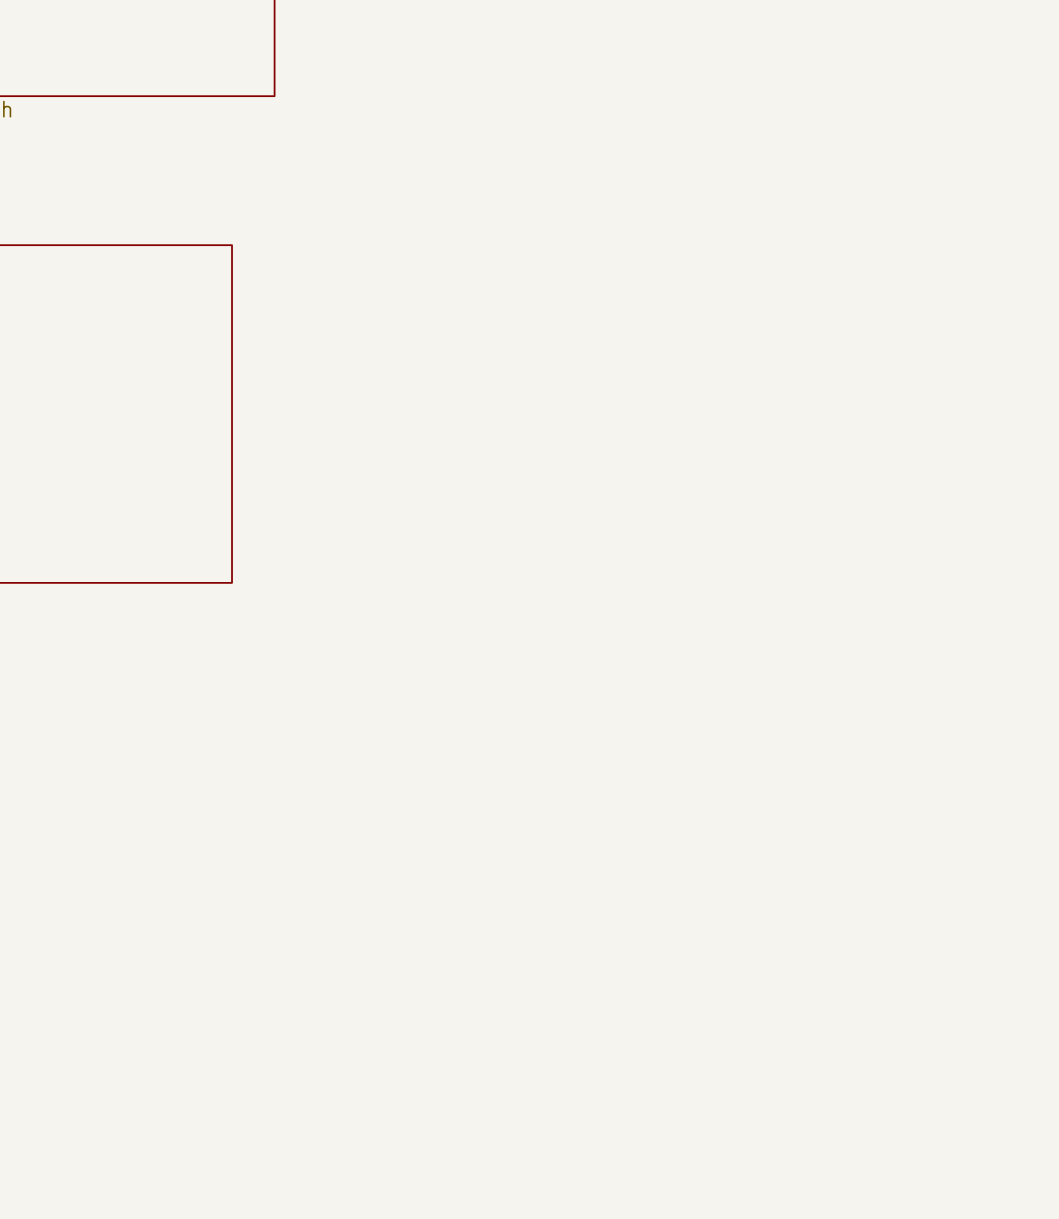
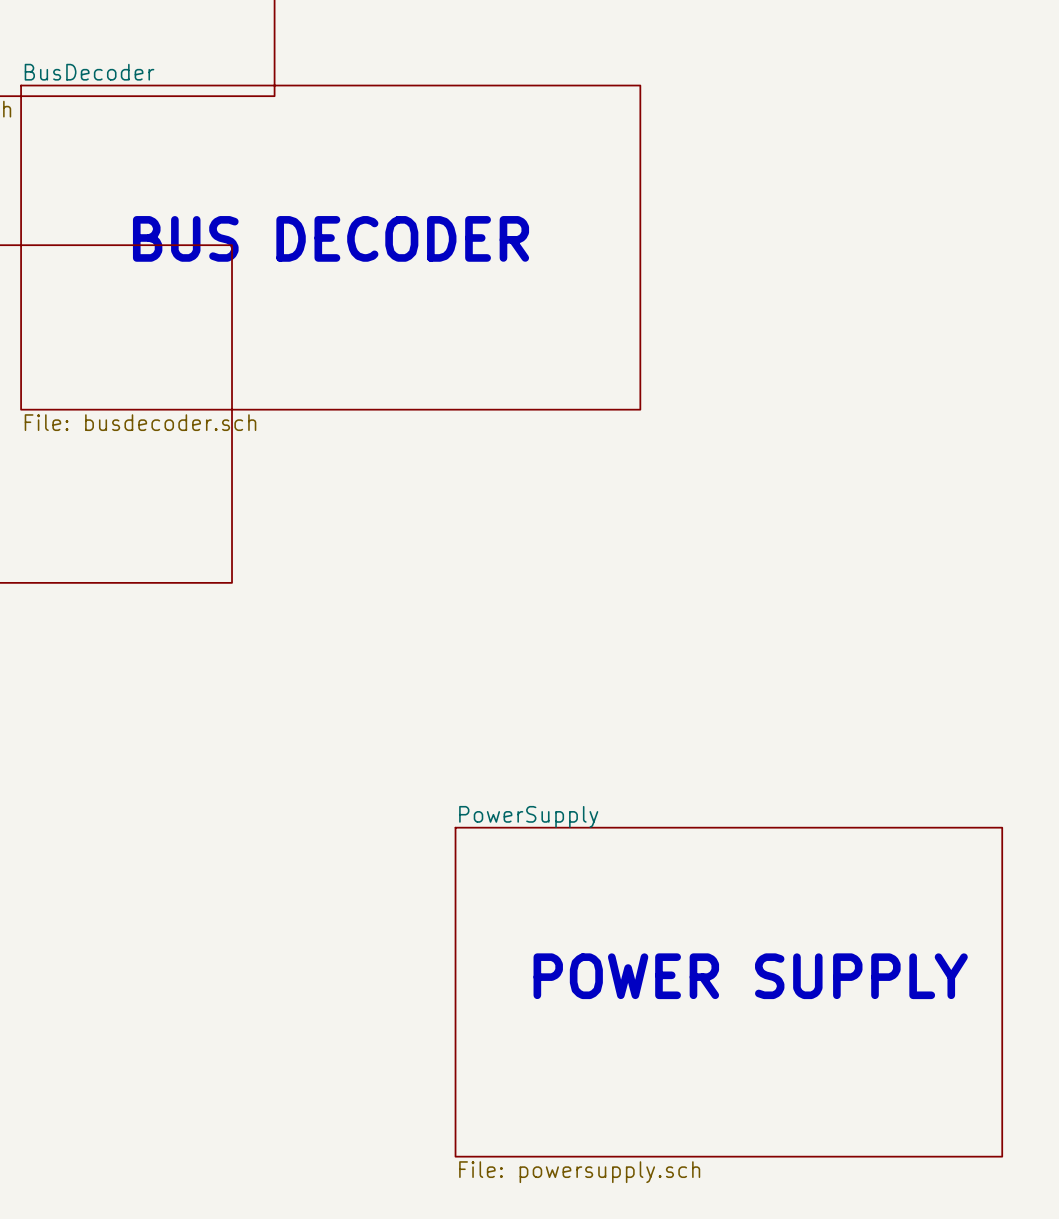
text: none -> BUS DECODER (331, 238)
sheet BusDecoder: none -> File: busdecoder.sch (330, 247)
text: none -> POWER SUPPLY (750, 976)
sheet PowerSupply: none -> File: powersupply.sch (728, 992)

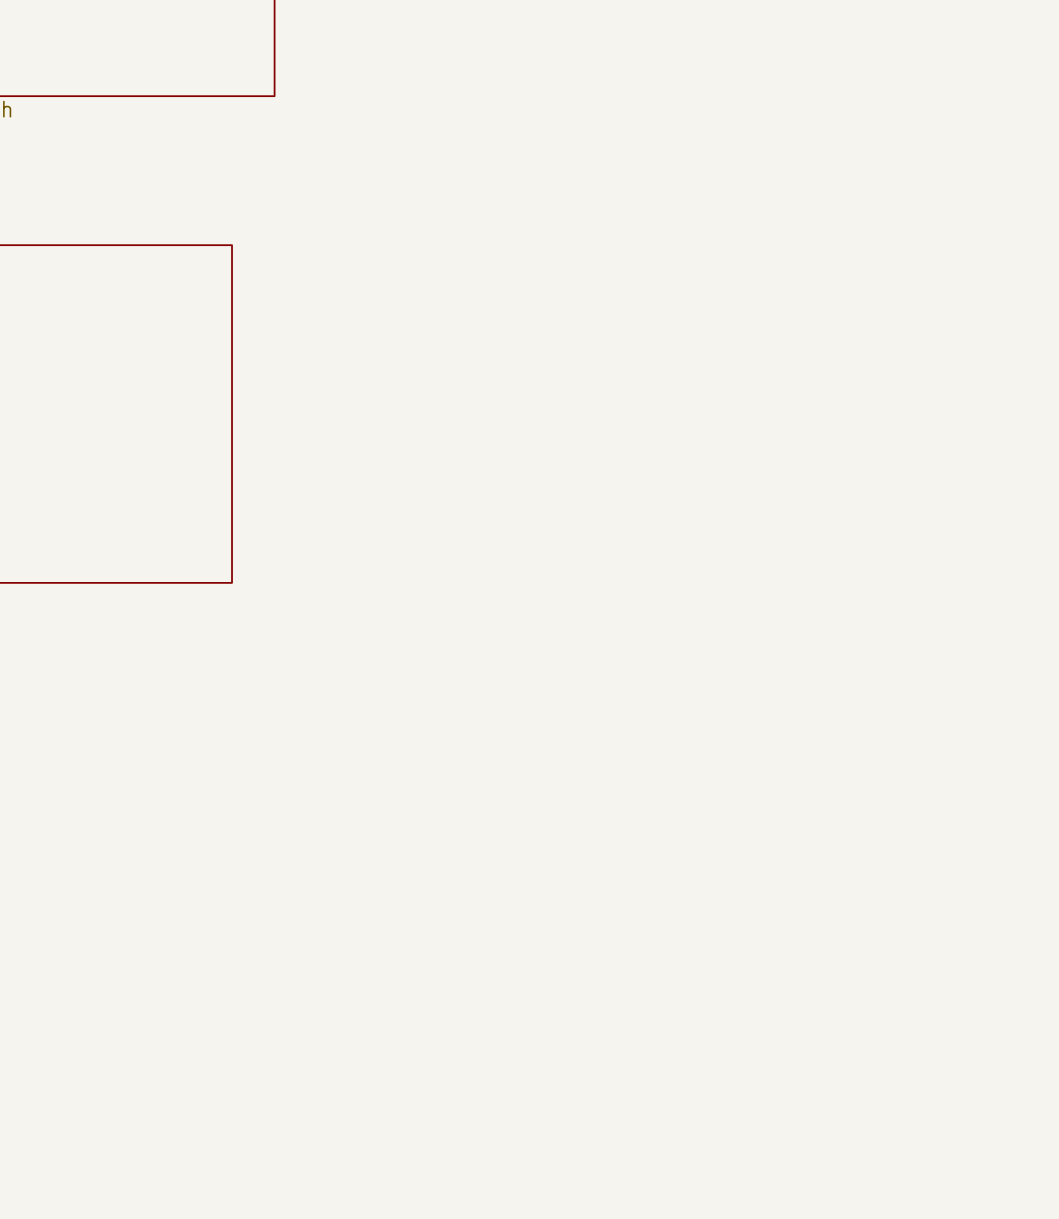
text: BUS DECODER (331, 238) -> none
sheet BusDecoder: File: busdecoder.sch (330, 247) -> none
text: POWER SUPPLY (750, 976) -> none
sheet PowerSupply: File: powersupply.sch (728, 992) -> none

